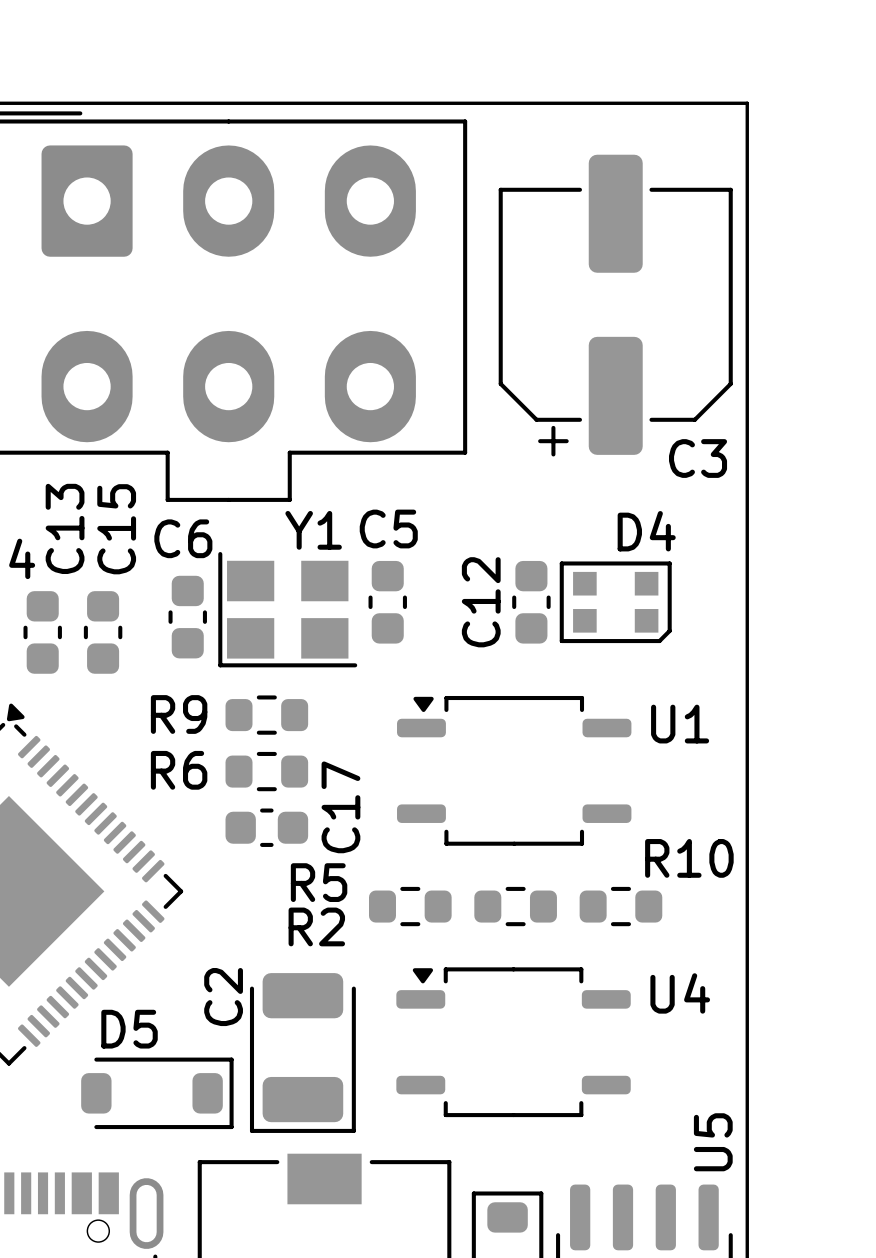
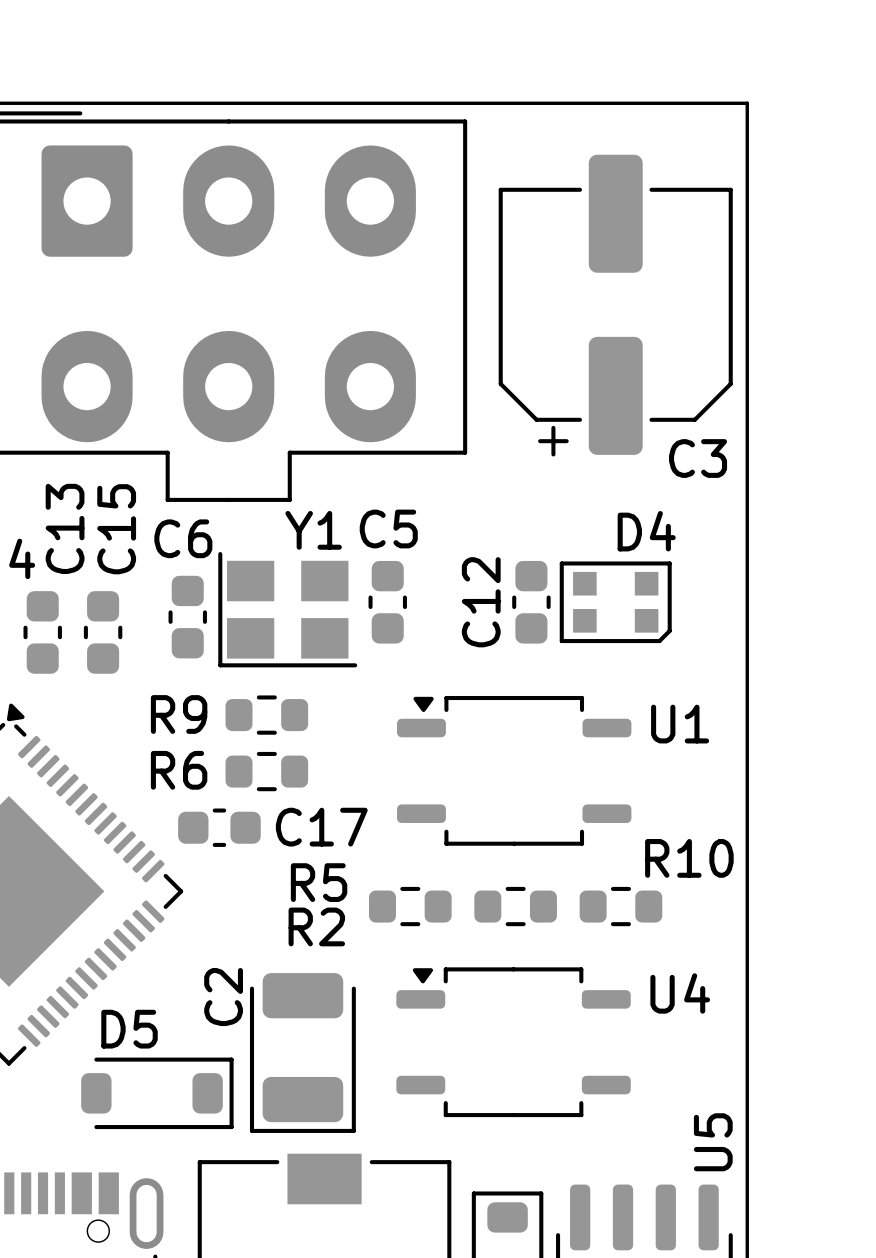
C17 name rotation: 0° (340, 807) -> 90° clockwise (321, 827)
C17 position: (266, 827) -> (219, 827)

